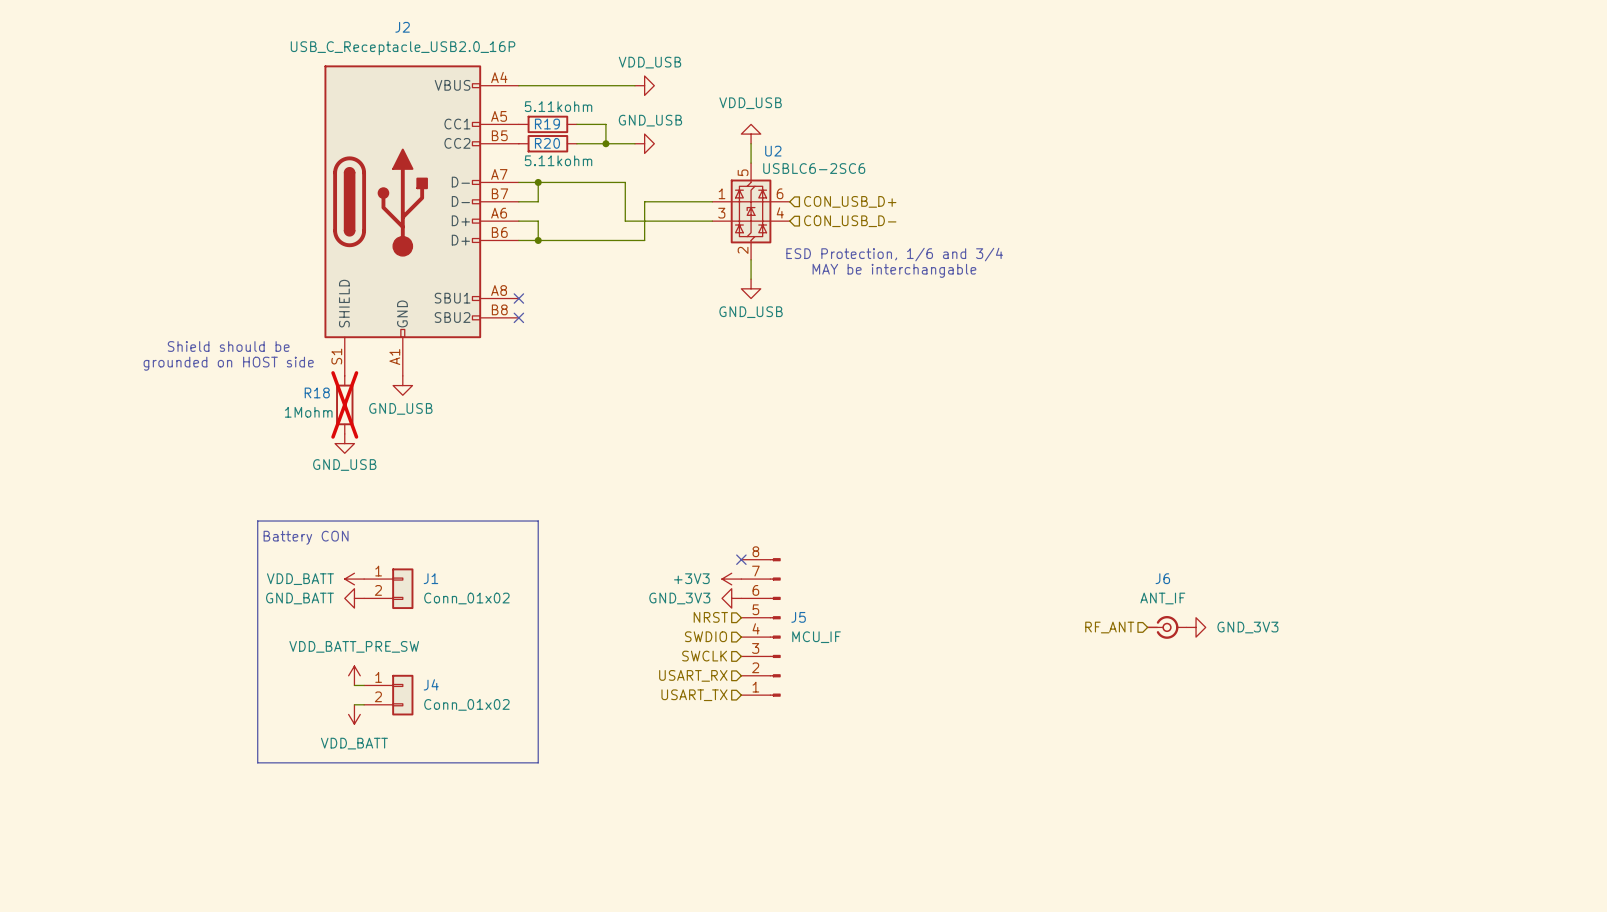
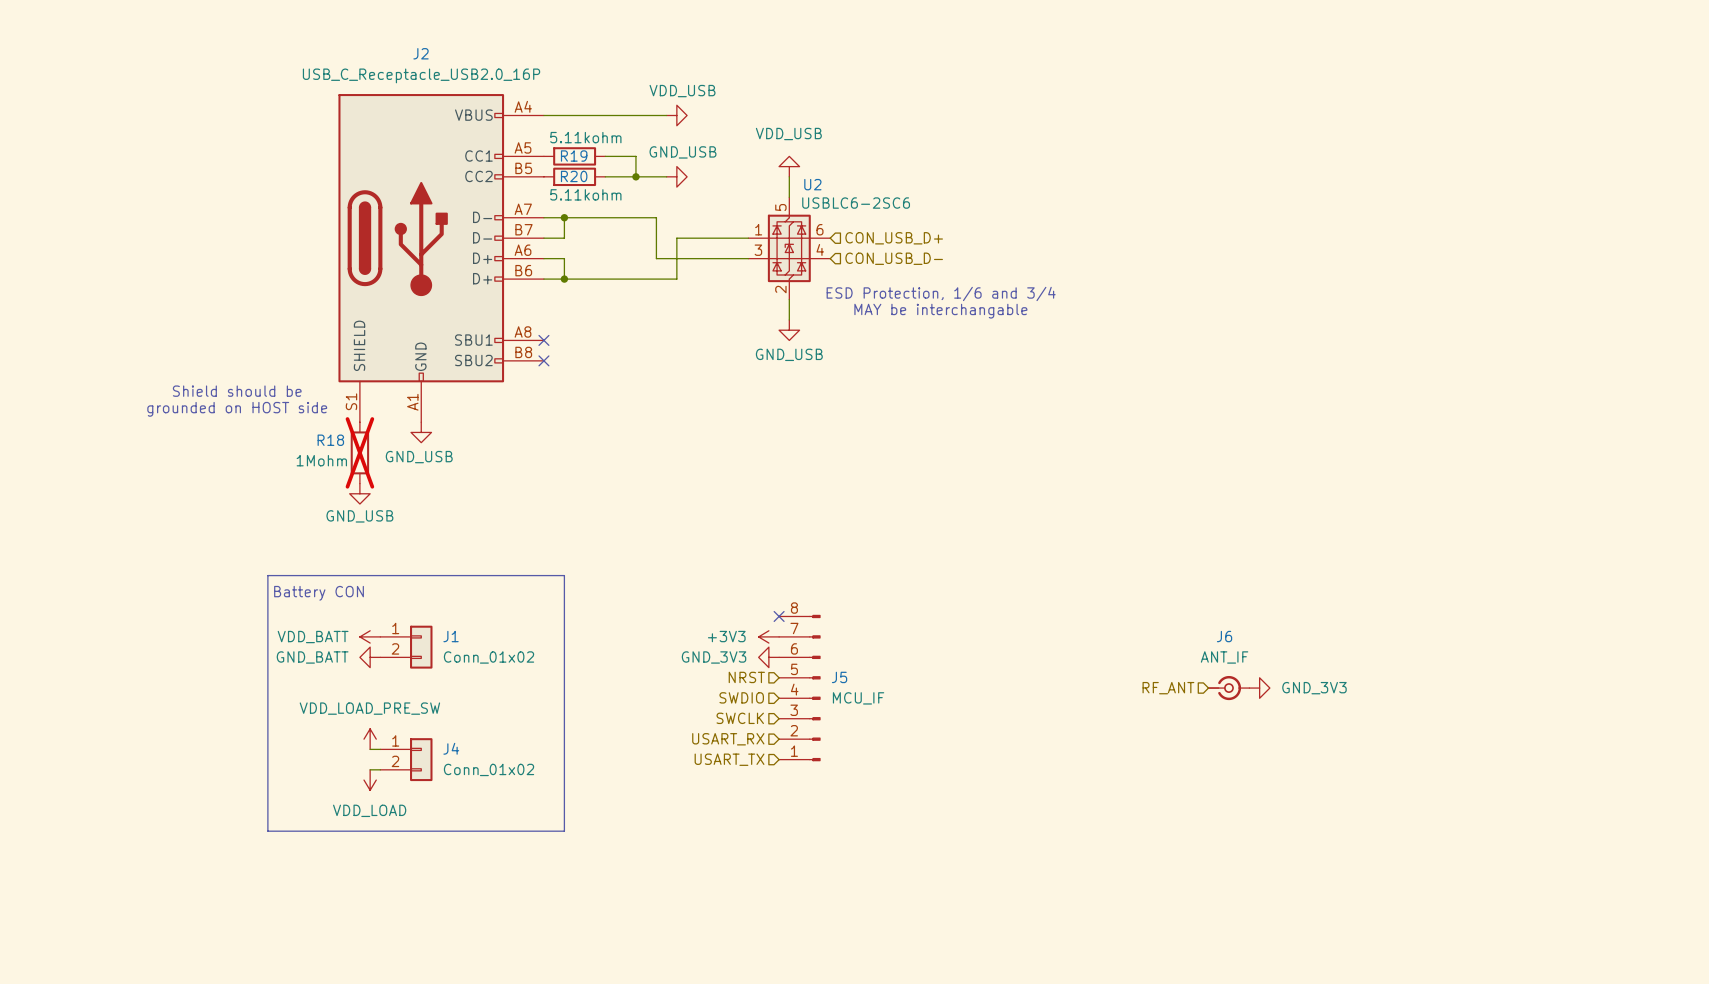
power symbol: VDD_BATT_PRE_SW (354, 675) -> VDD_LOAD_PRE_SW (370, 739)
power symbol: VDD_BATT (354, 714) -> VDD_LOAD (370, 780)

